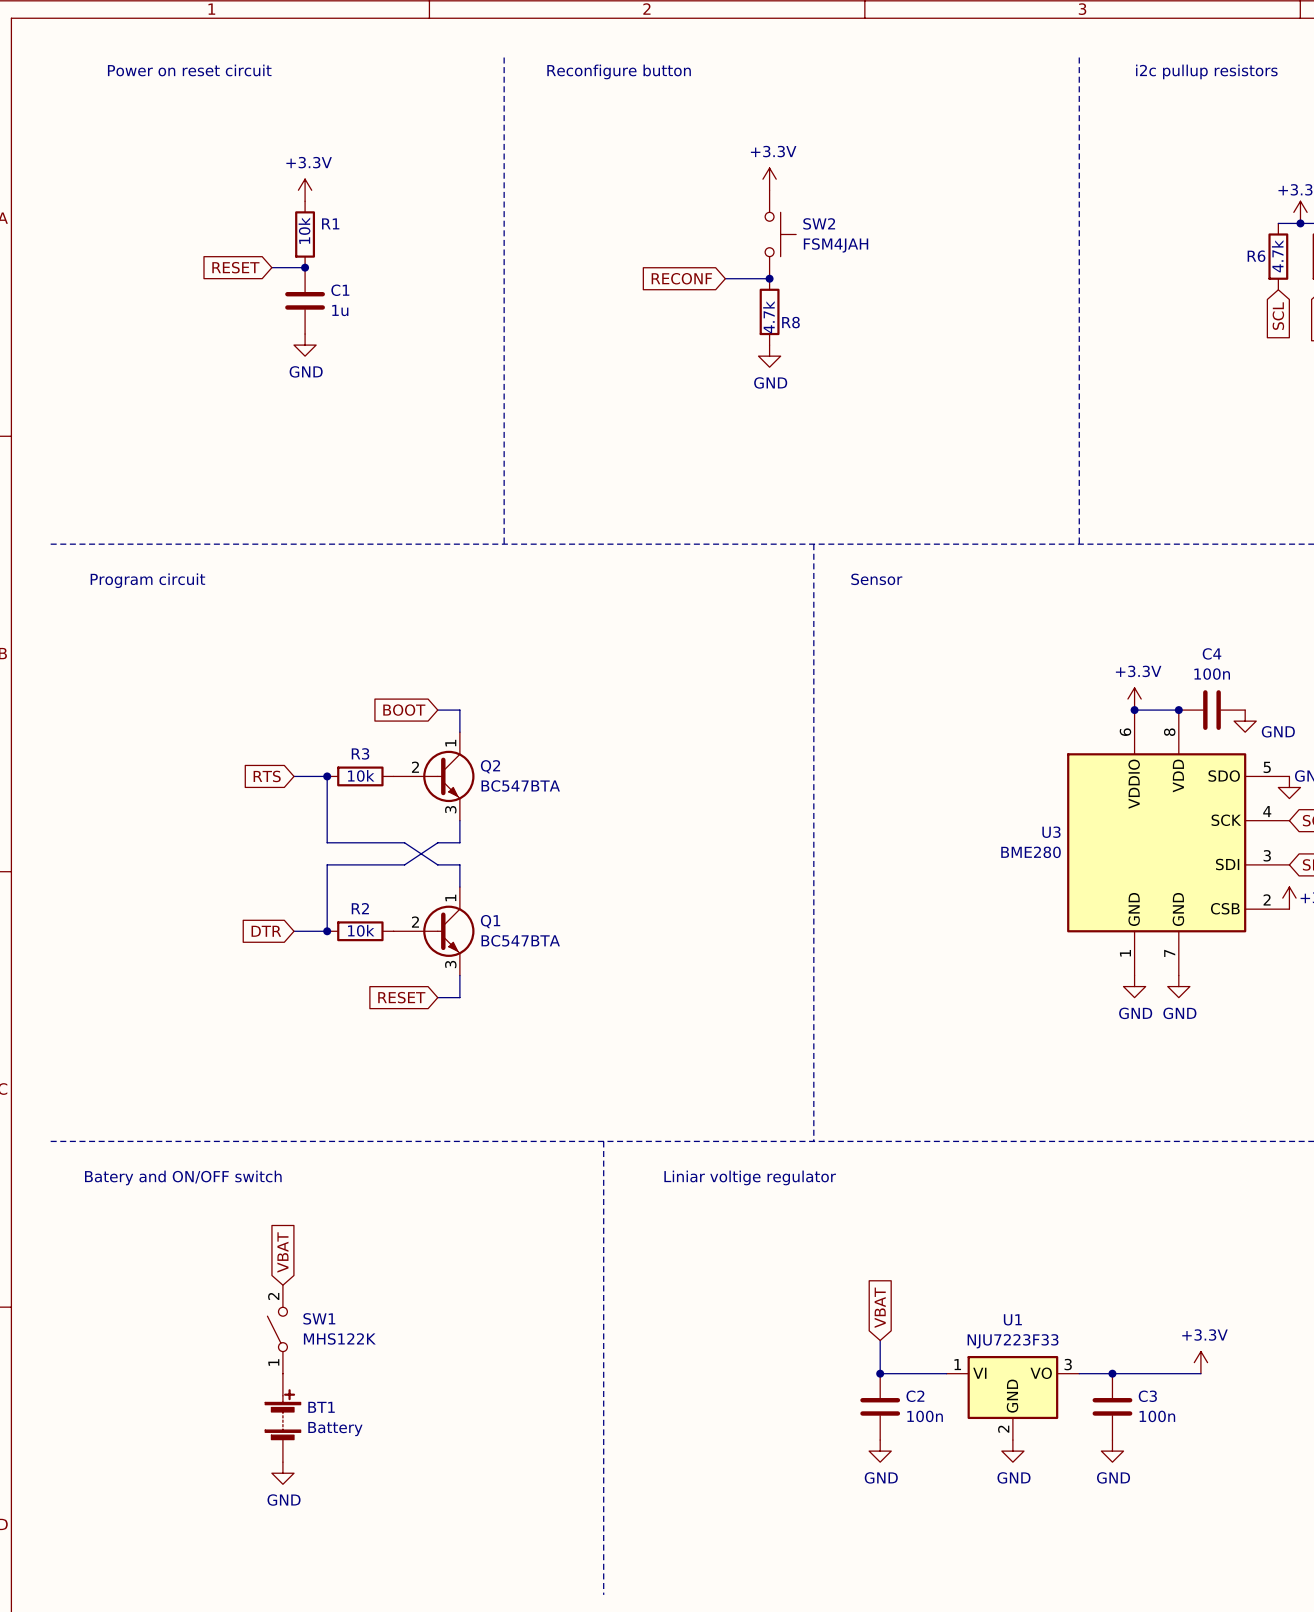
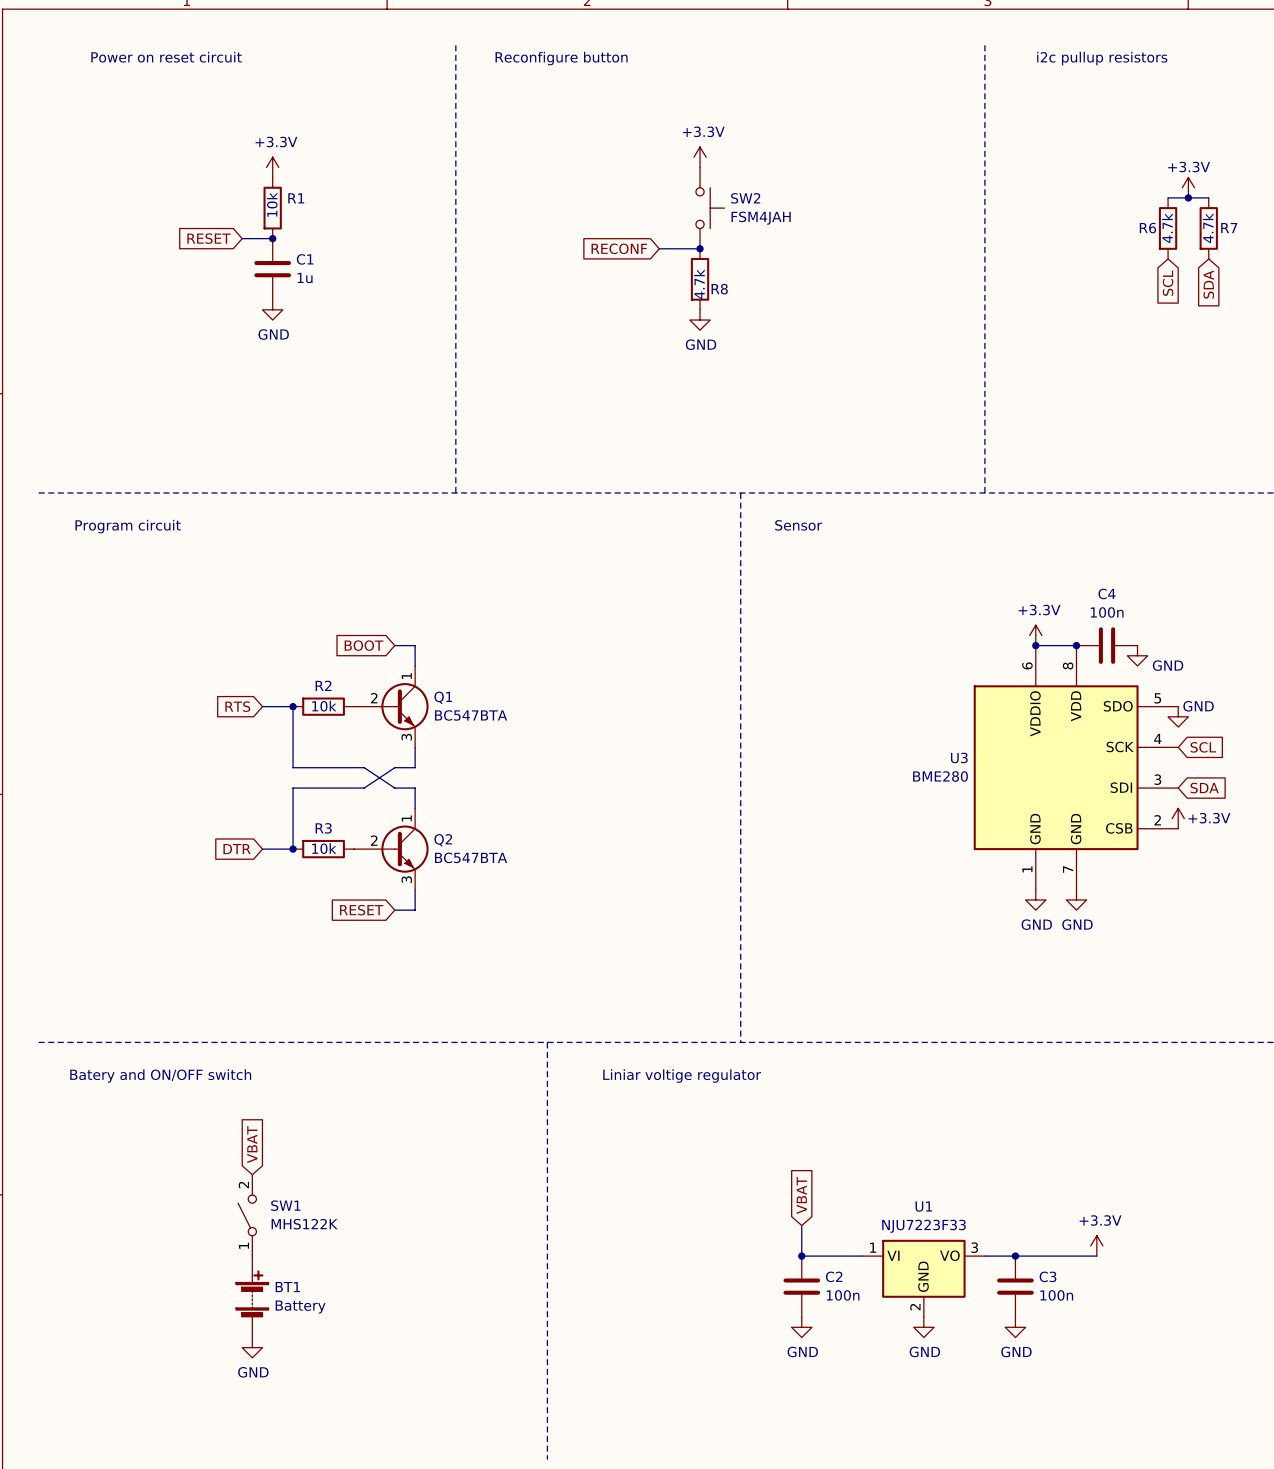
R3 name: R3 (360, 753) -> R2 (323, 685)
Q2 name: Q2 (490, 766) -> Q1 (443, 697)
R2 name: R2 (360, 908) -> R3 (323, 828)
Q1 name: Q1 (490, 921) -> Q2 (443, 840)

